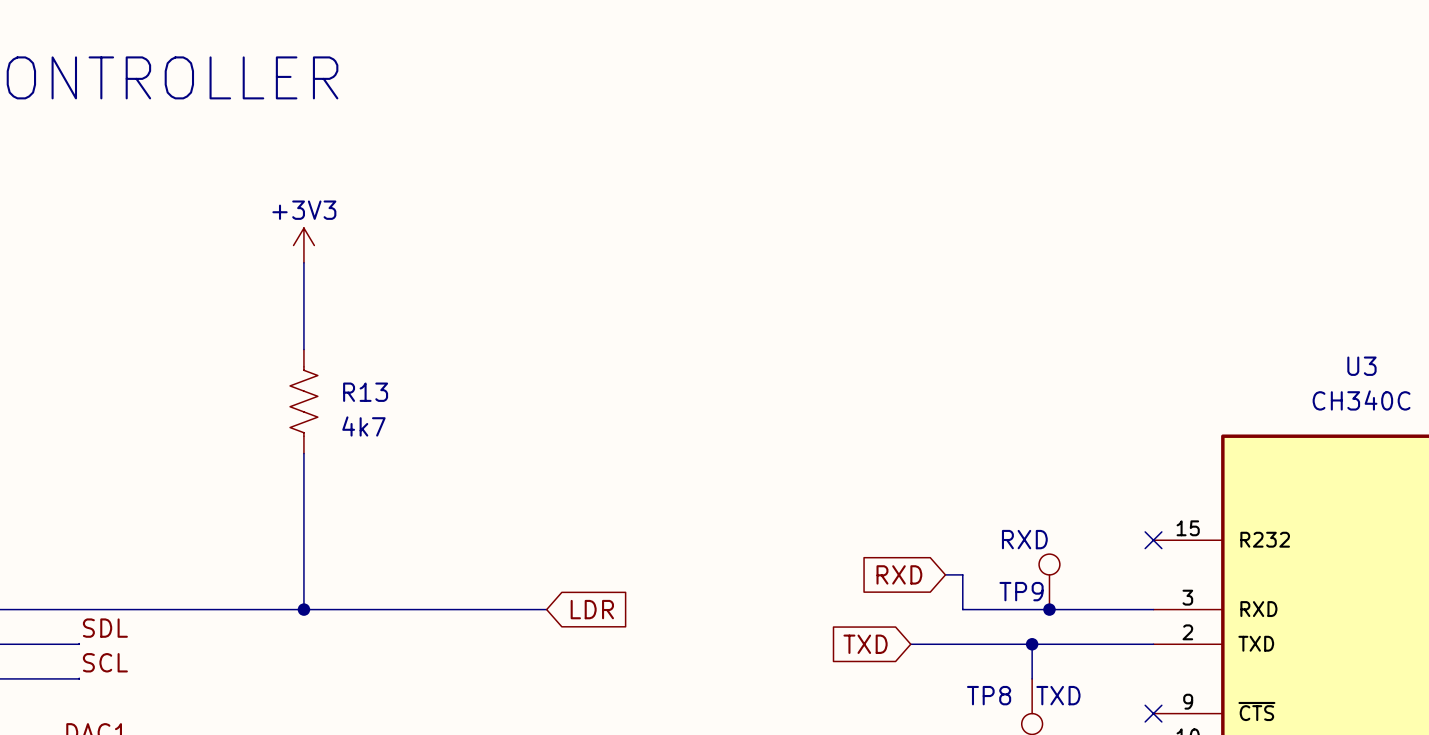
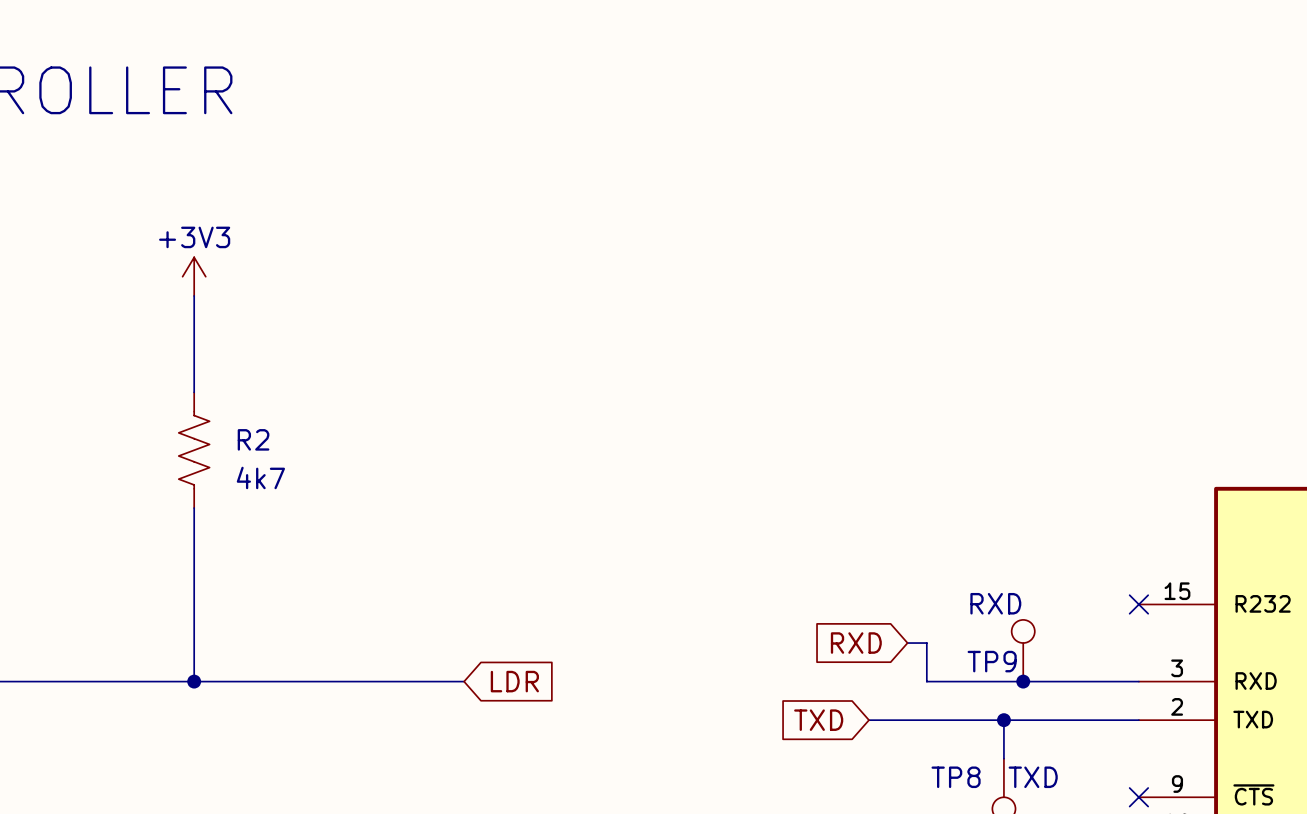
R13 name: R13 (365, 392) -> R2 (253, 439)

